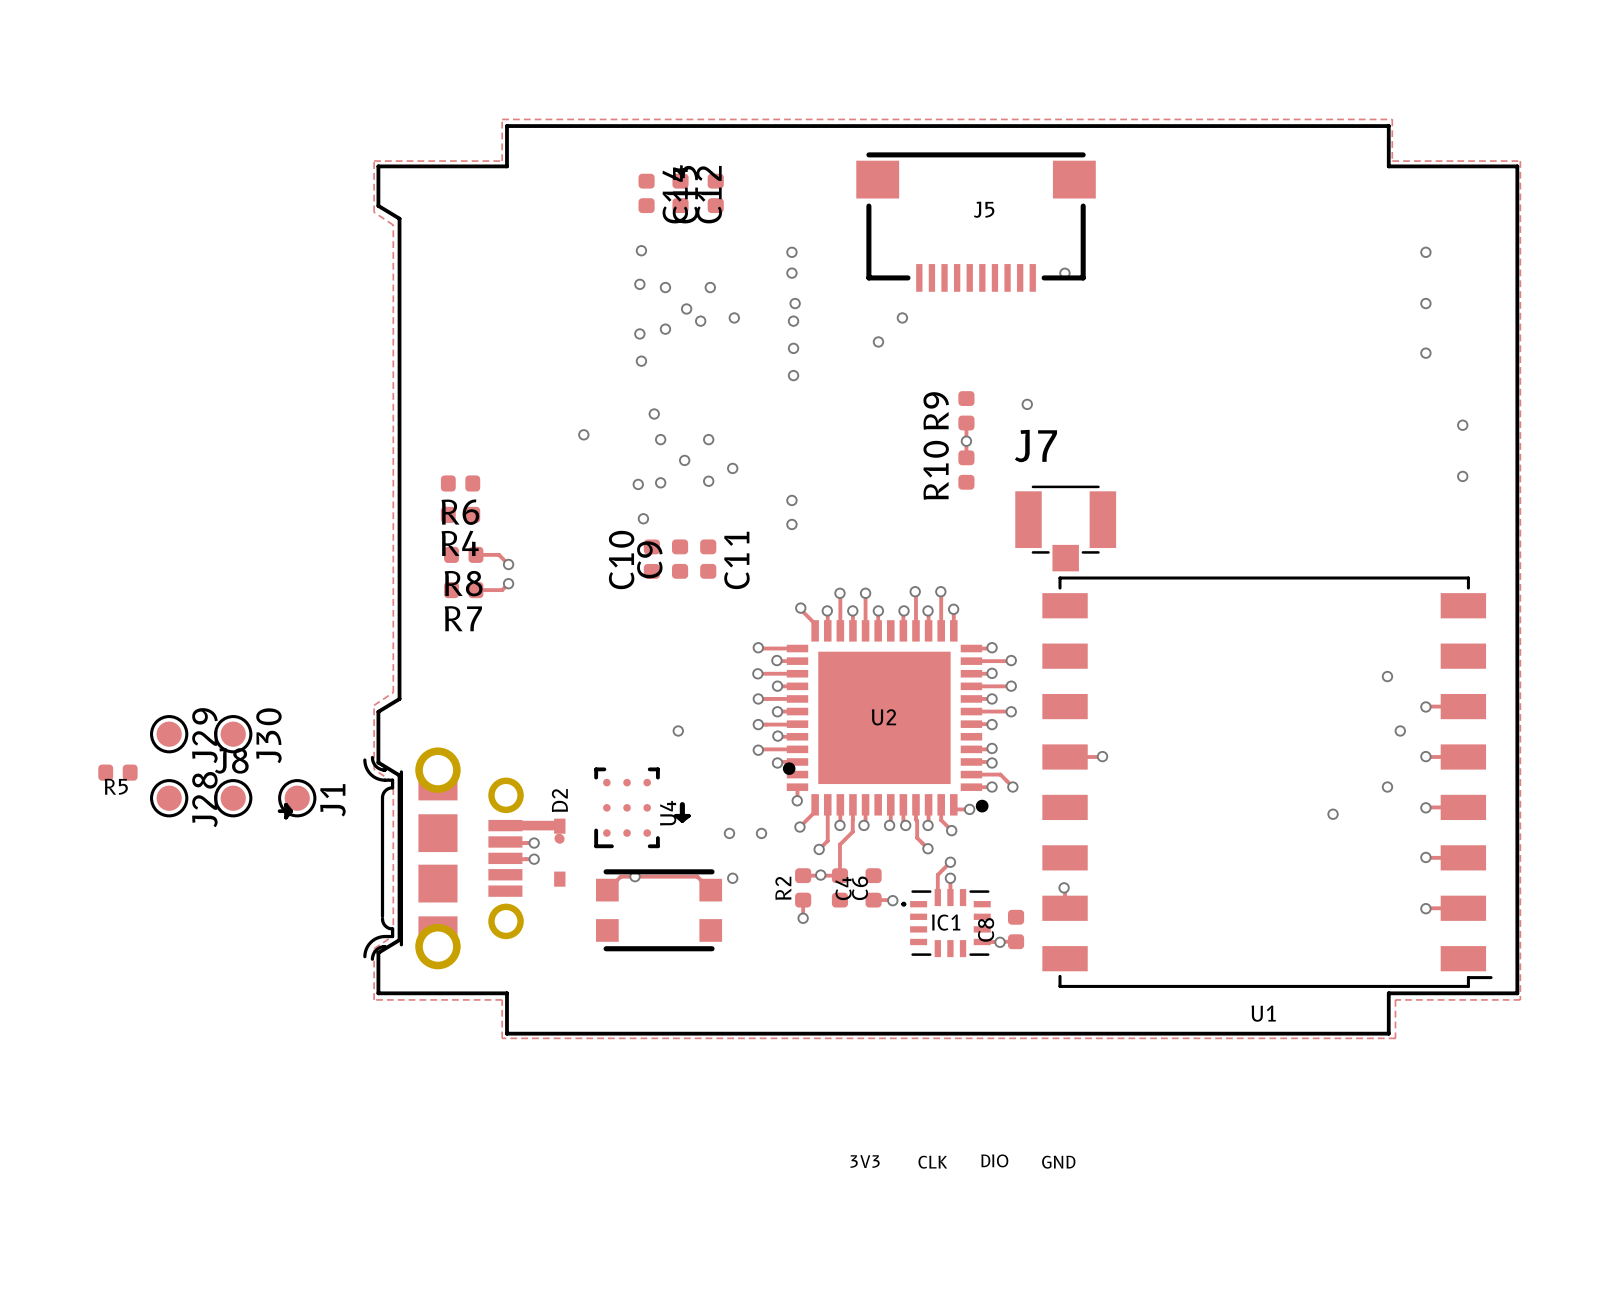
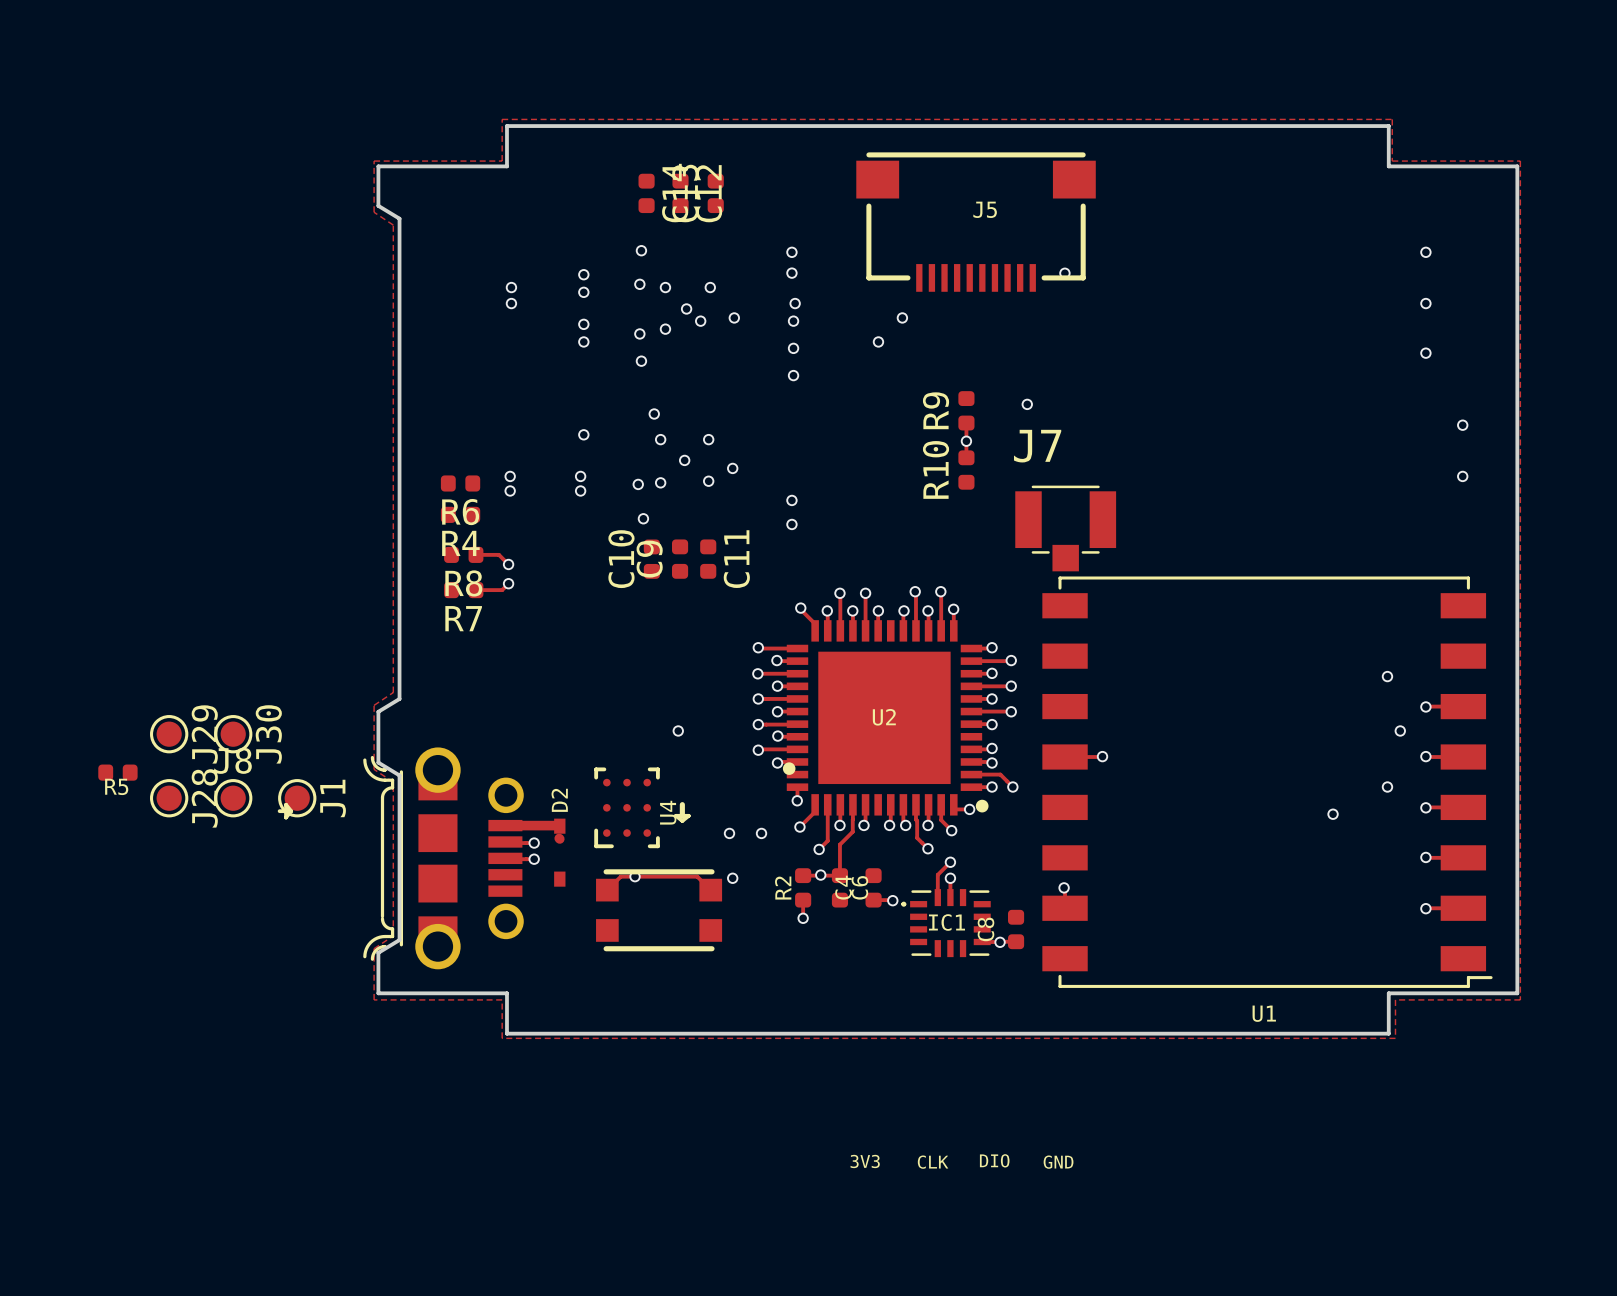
via: none -> (583, 274)
via: none -> (511, 287)
via: none -> (583, 292)
via: none -> (511, 303)
via: none -> (583, 324)
via: none -> (583, 341)
via: none -> (510, 476)
via: none -> (580, 476)
via: none -> (510, 490)
via: none -> (580, 490)

